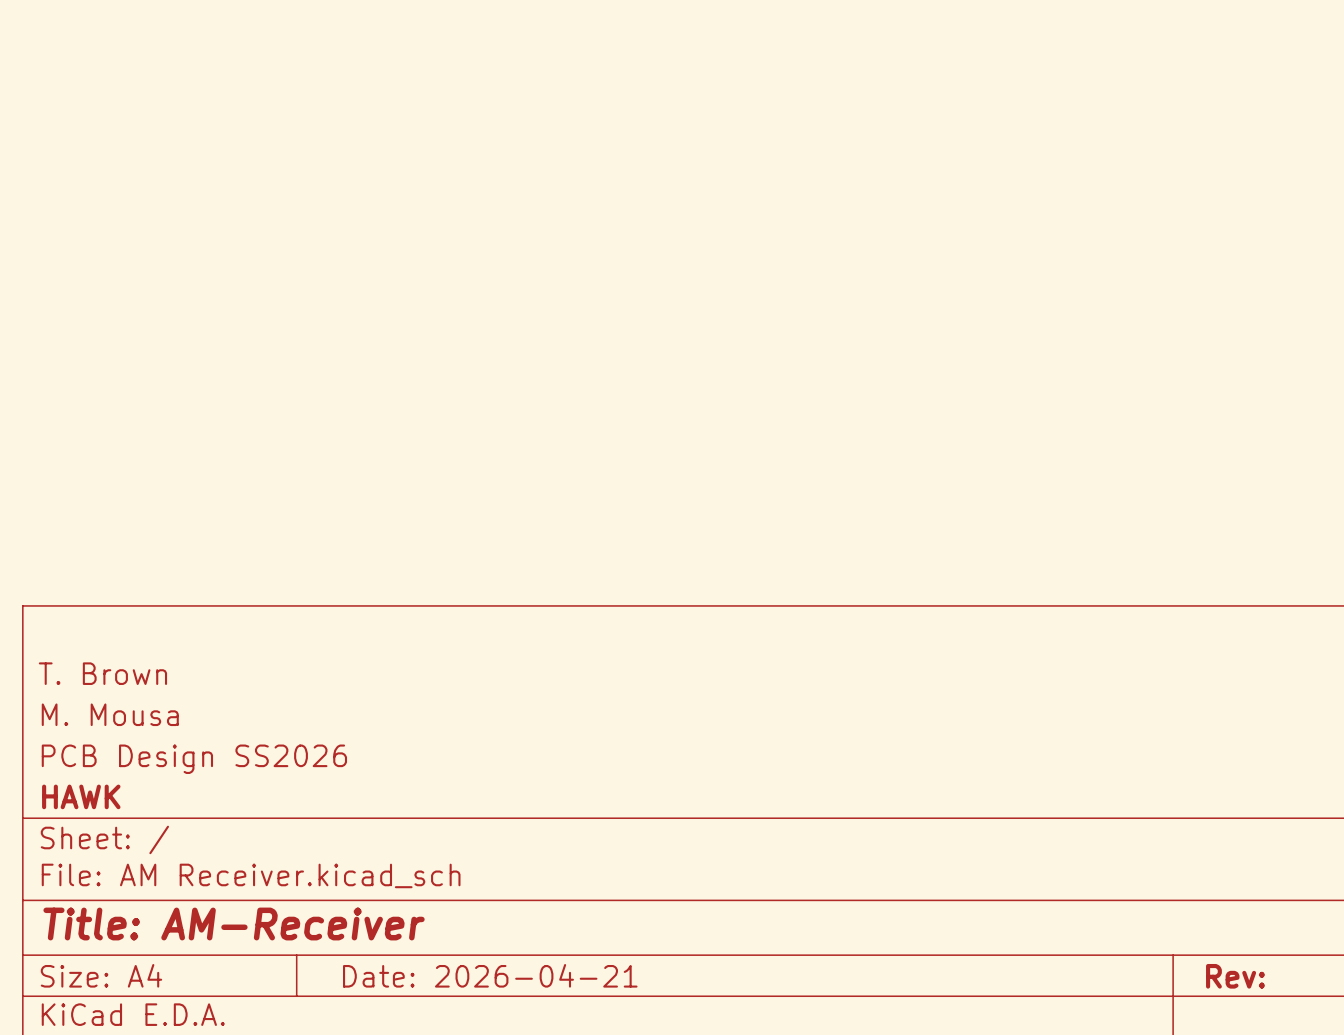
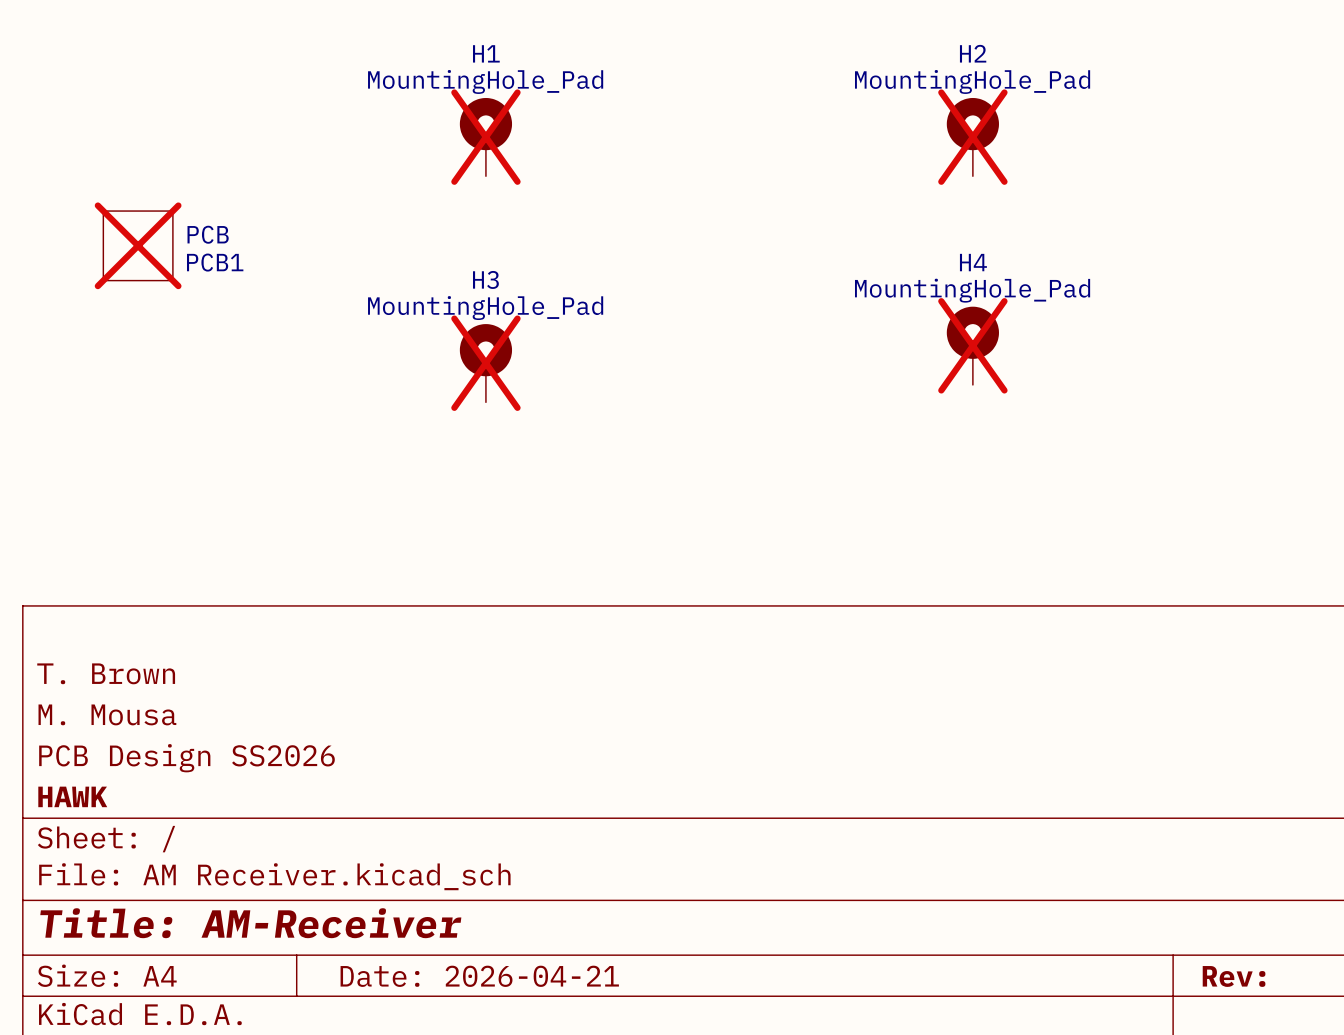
H1: none -> MountingHole_Pad (485, 137)
H2: none -> MountingHole_Pad (972, 137)
PCB1: none -> PCB (138, 245)
H4: none -> MountingHole_Pad (972, 345)
H3: none -> MountingHole_Pad (485, 363)

